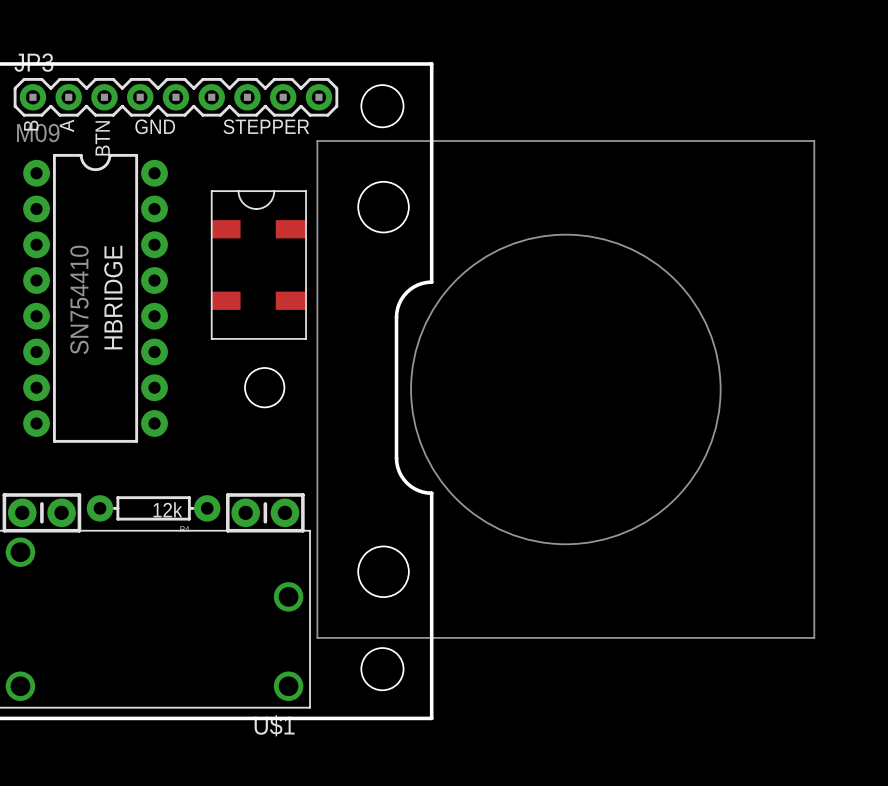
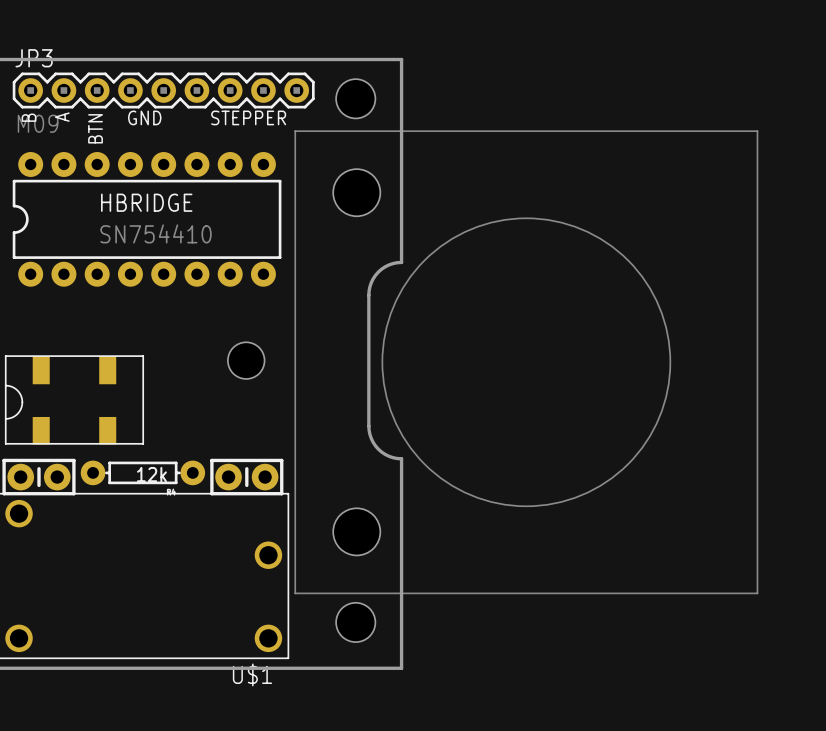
part rotation: 0° (258, 265) -> 90° counterclockwise (74, 399)
part position: (258, 265) -> (74, 399)
HBRIDGE rotation: 0° (95, 298) -> 90° counterclockwise (147, 219)

